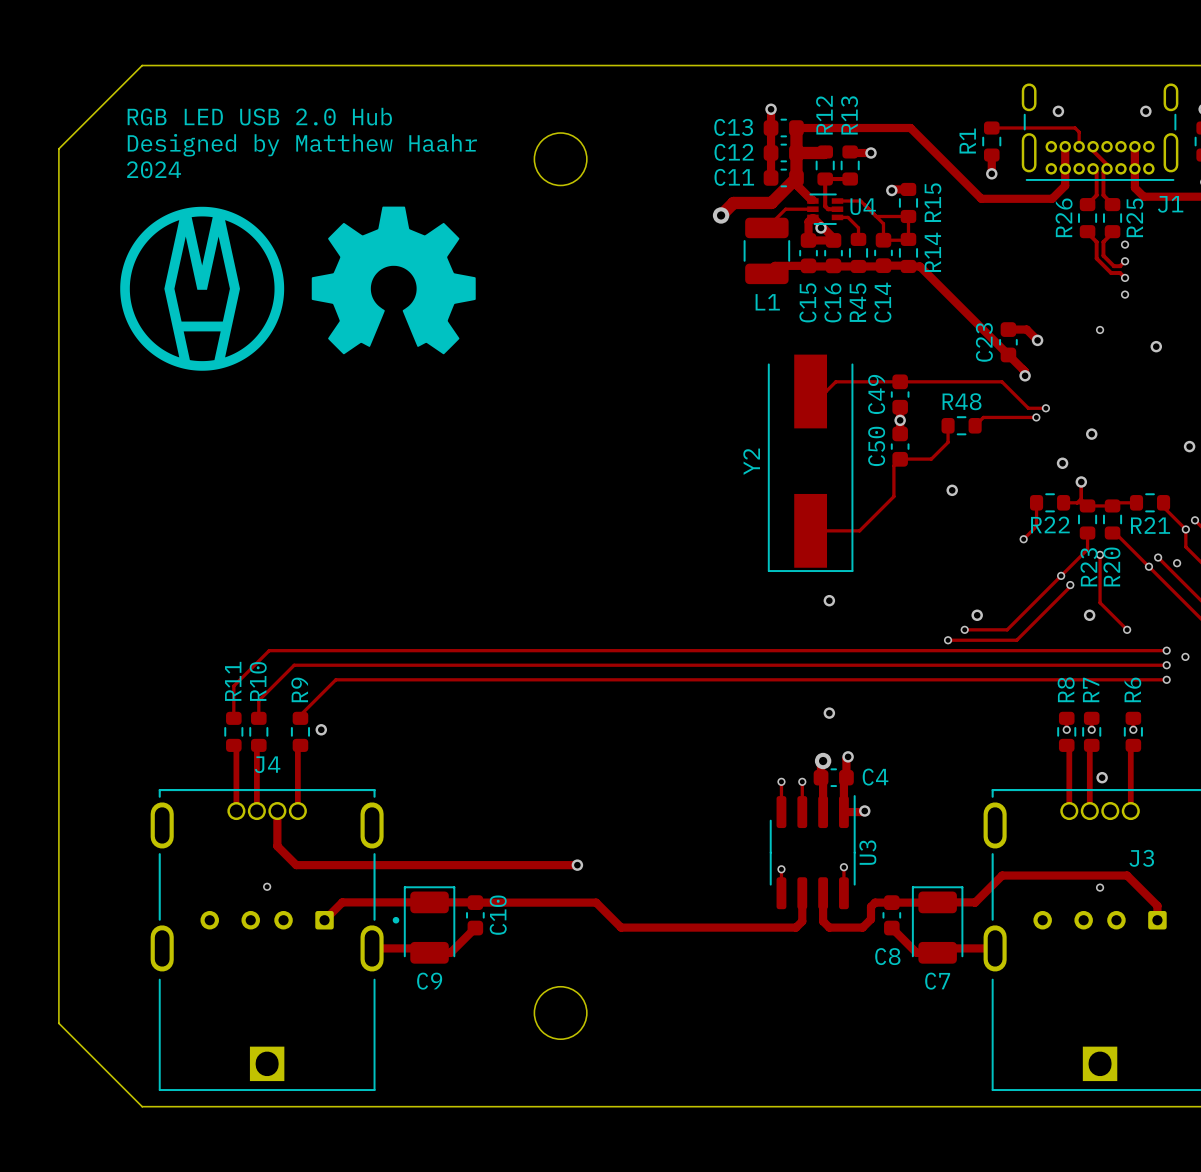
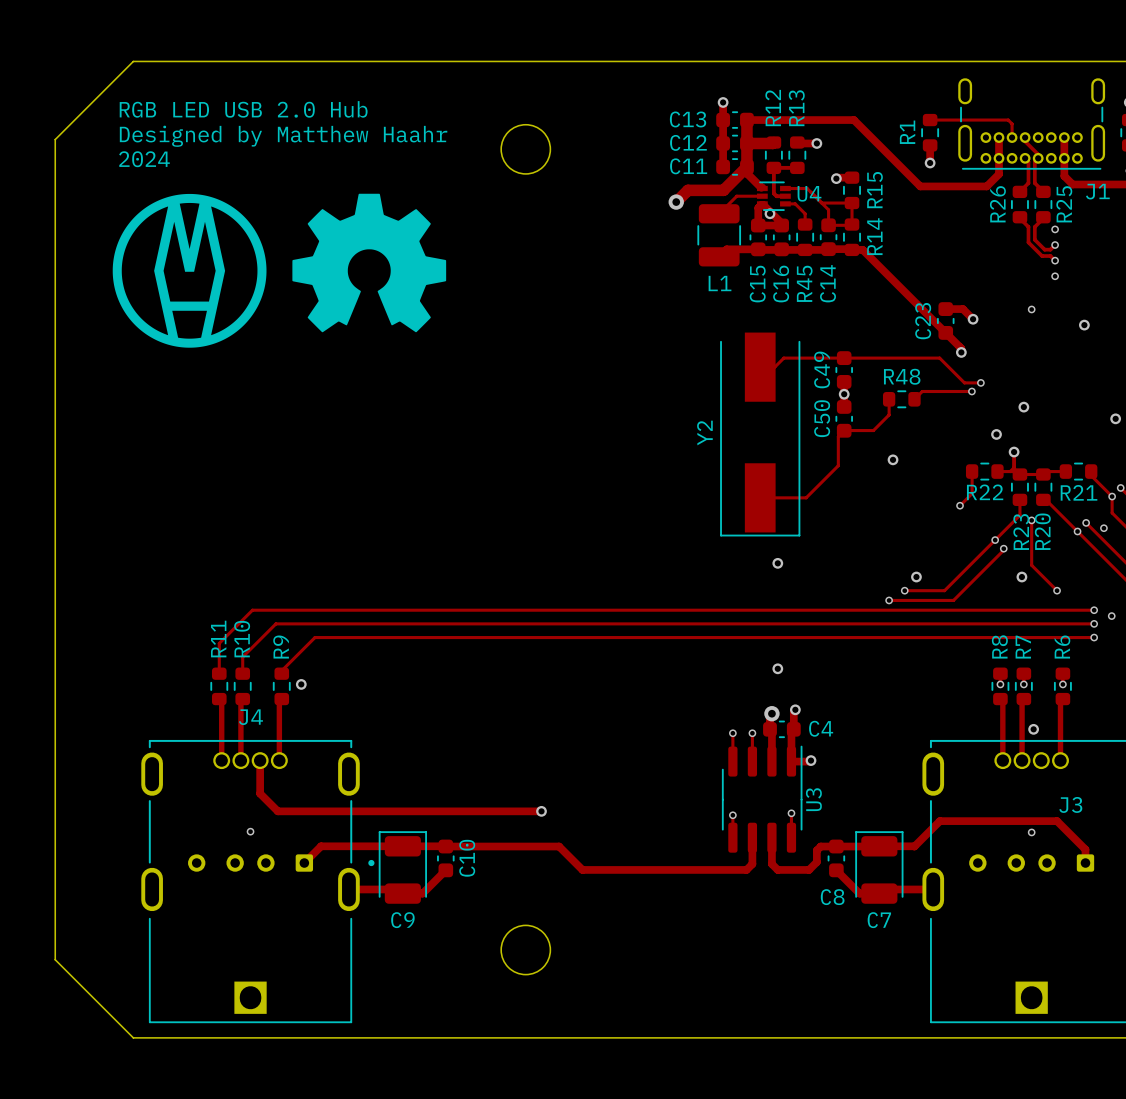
via: (1058, 111) -> none
via: (1145, 111) -> none

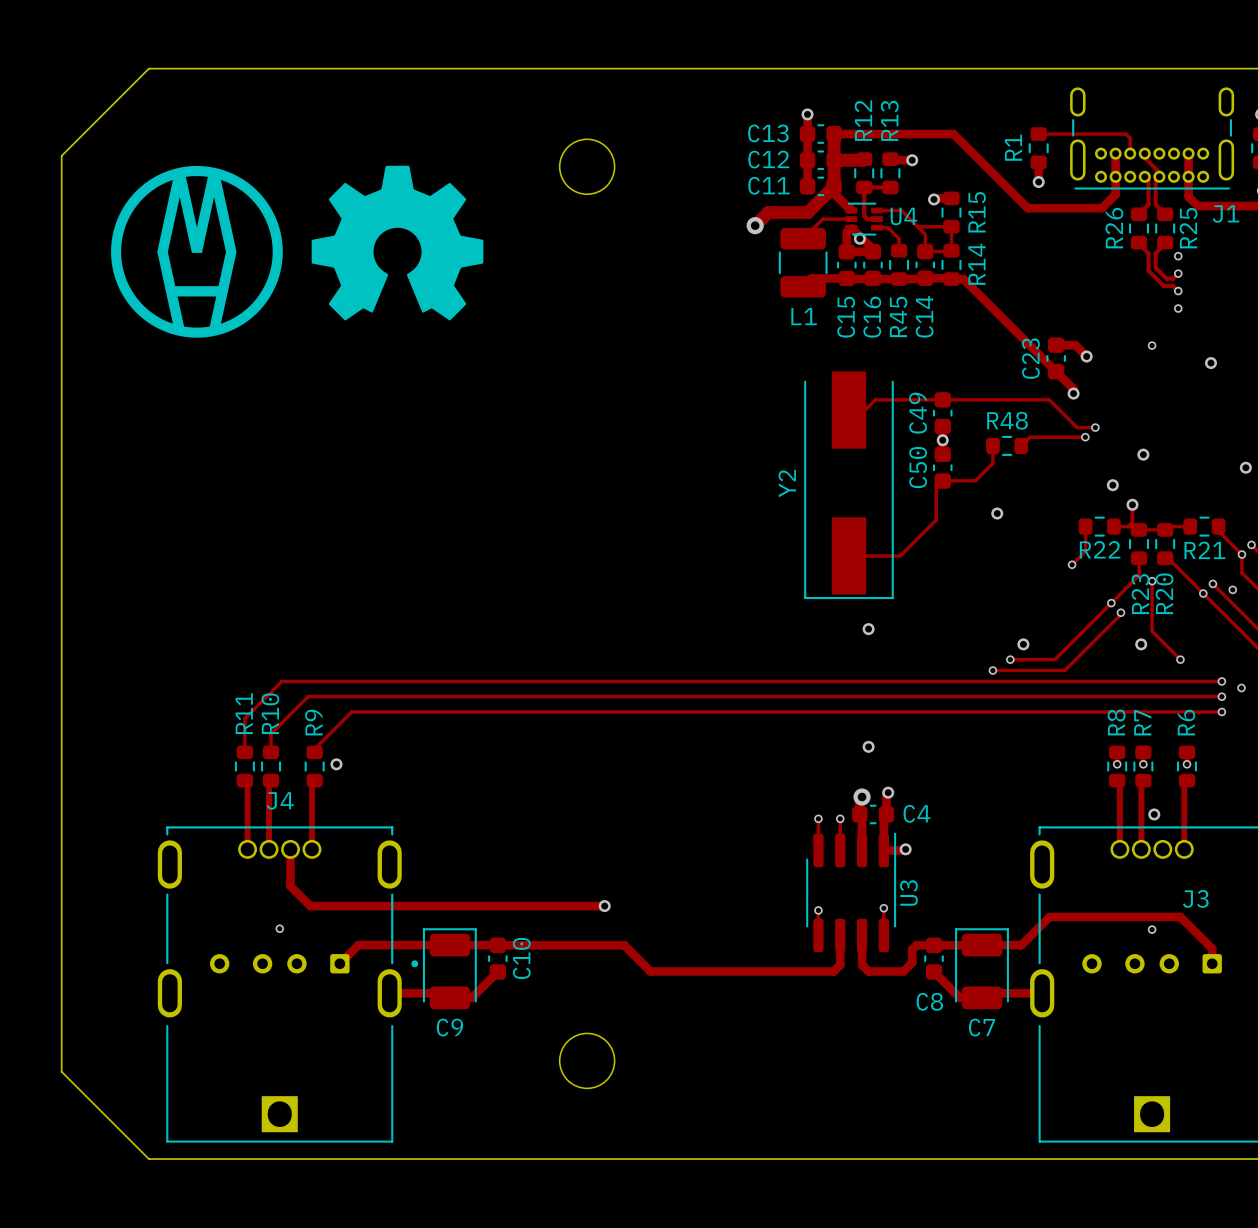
text: RGB LED USB 2.0 Hub (243, 109) -> none
text: Designed by Matthew Haahr (283, 136) -> none
text: 2024 (144, 159) -> none
drawing position: (369, 262) -> (397, 243)
drawing position: (189, 270) -> (196, 251)

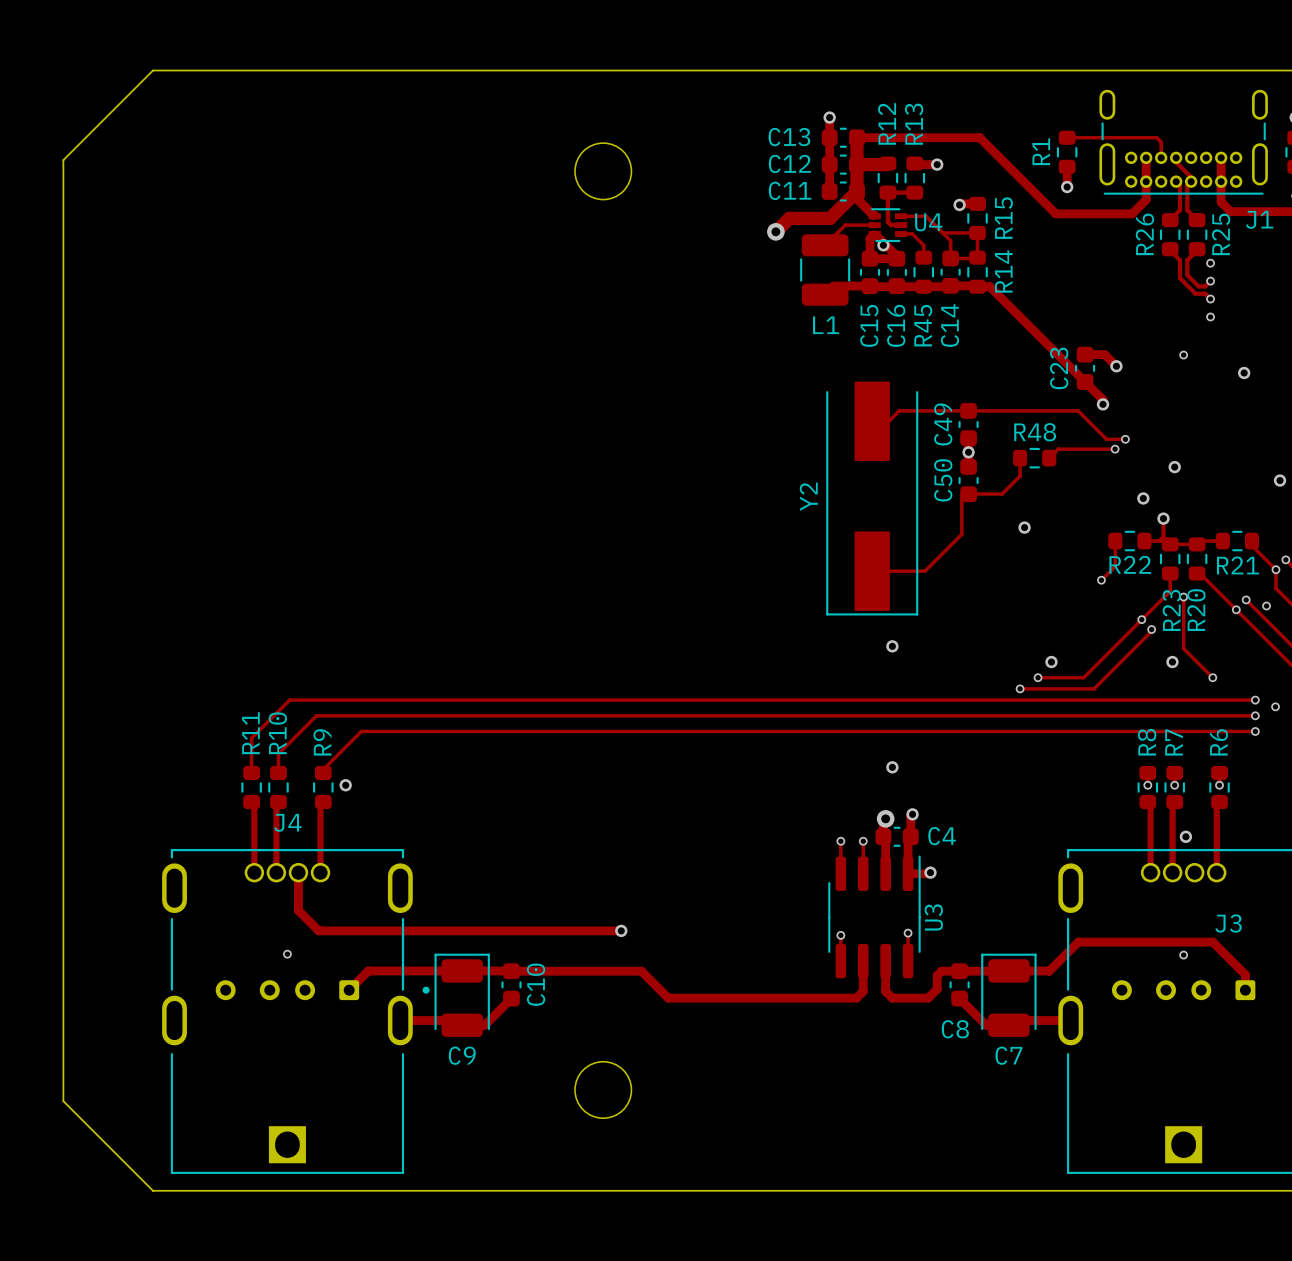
drawing: [111, 165, 283, 338] -> none
drawing: [311, 165, 484, 321] -> none

